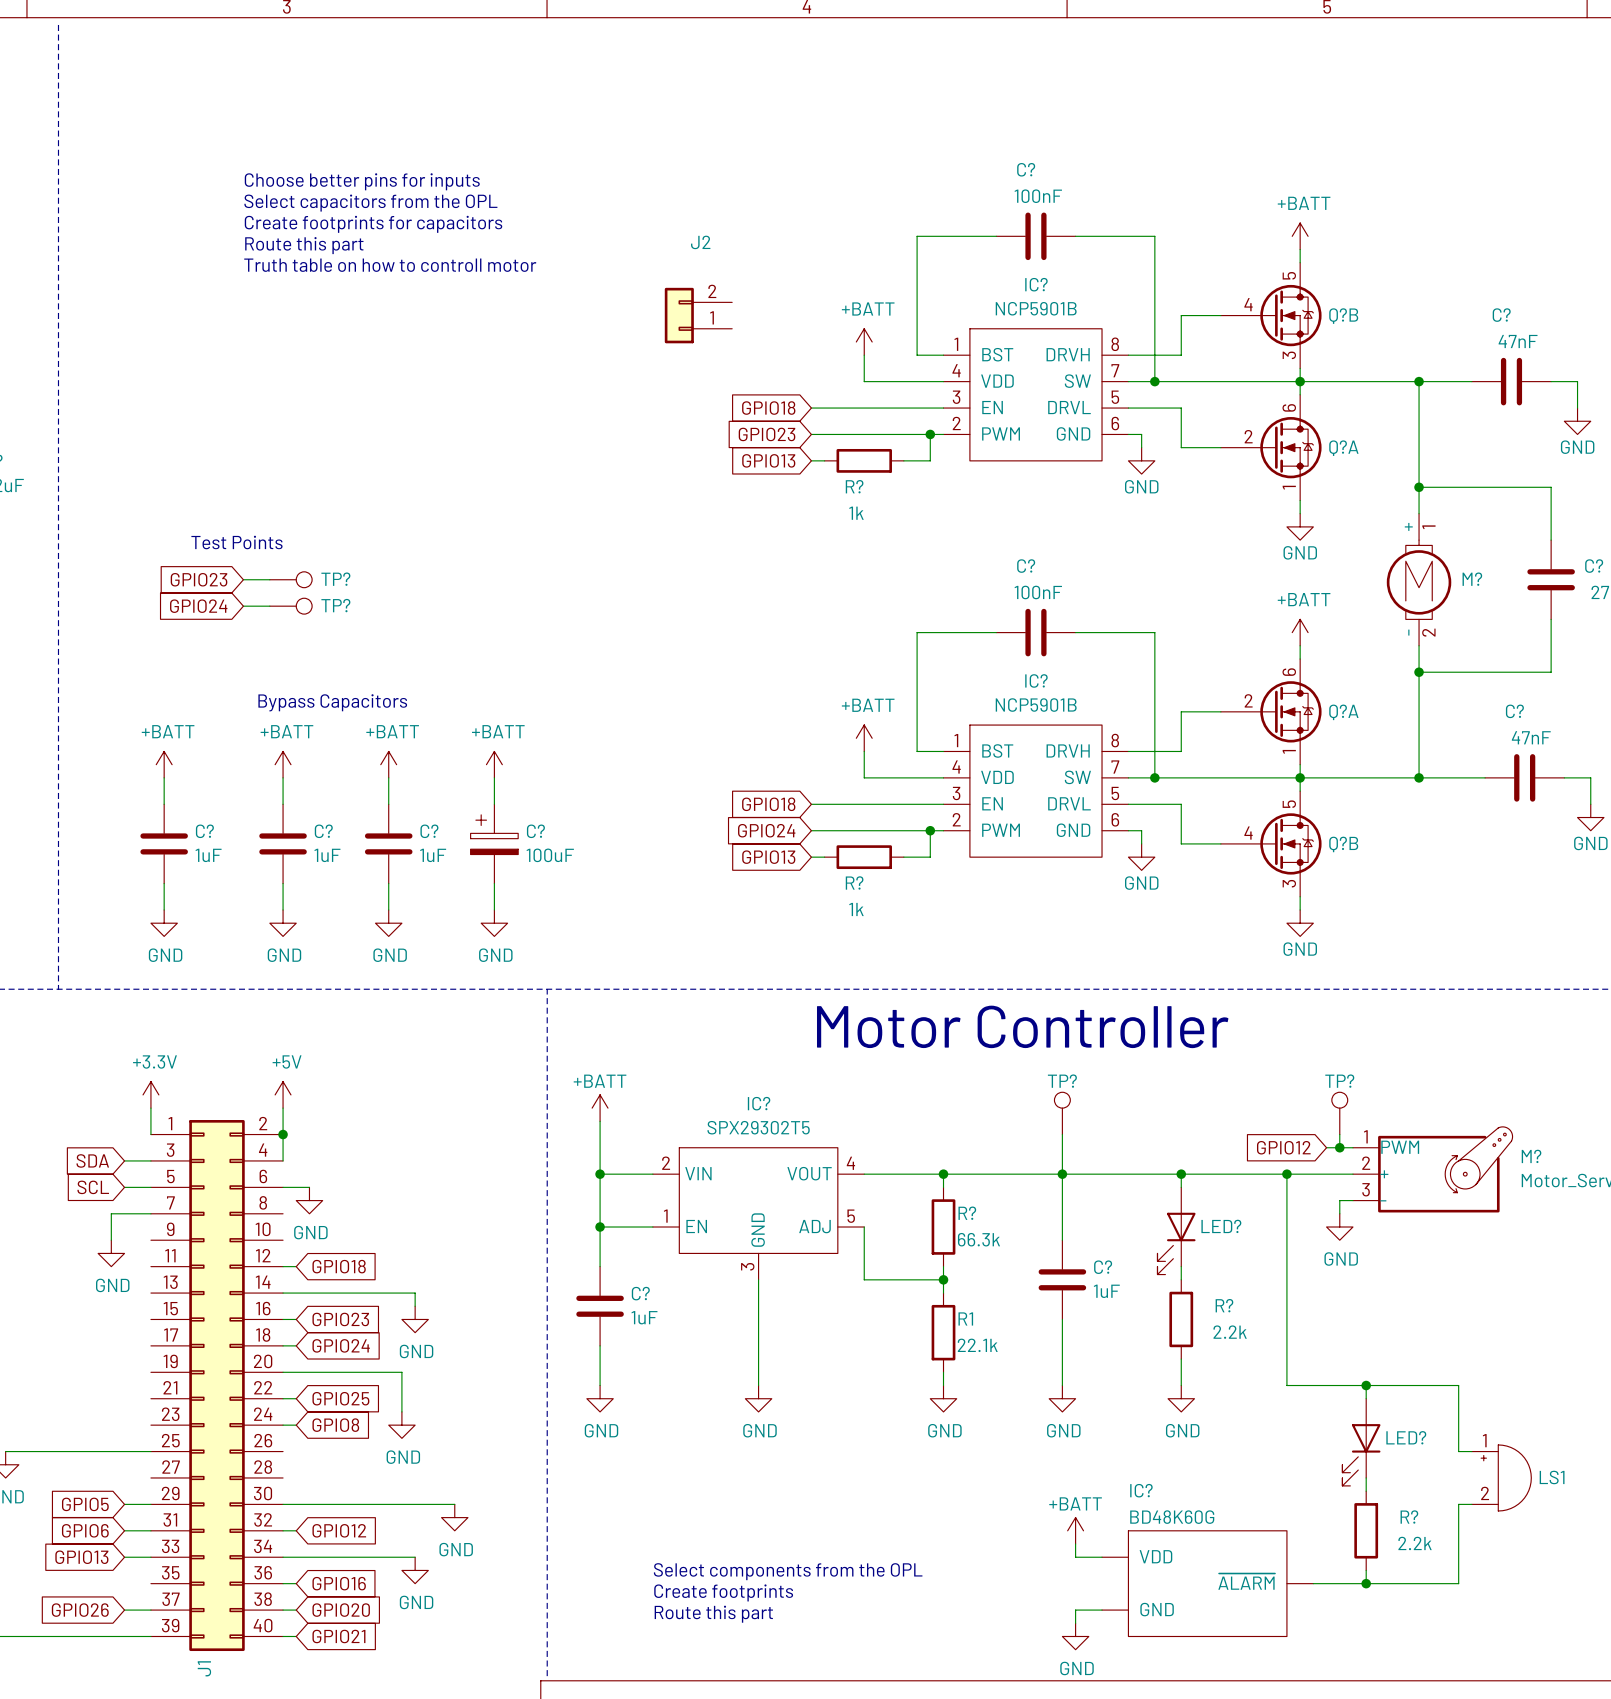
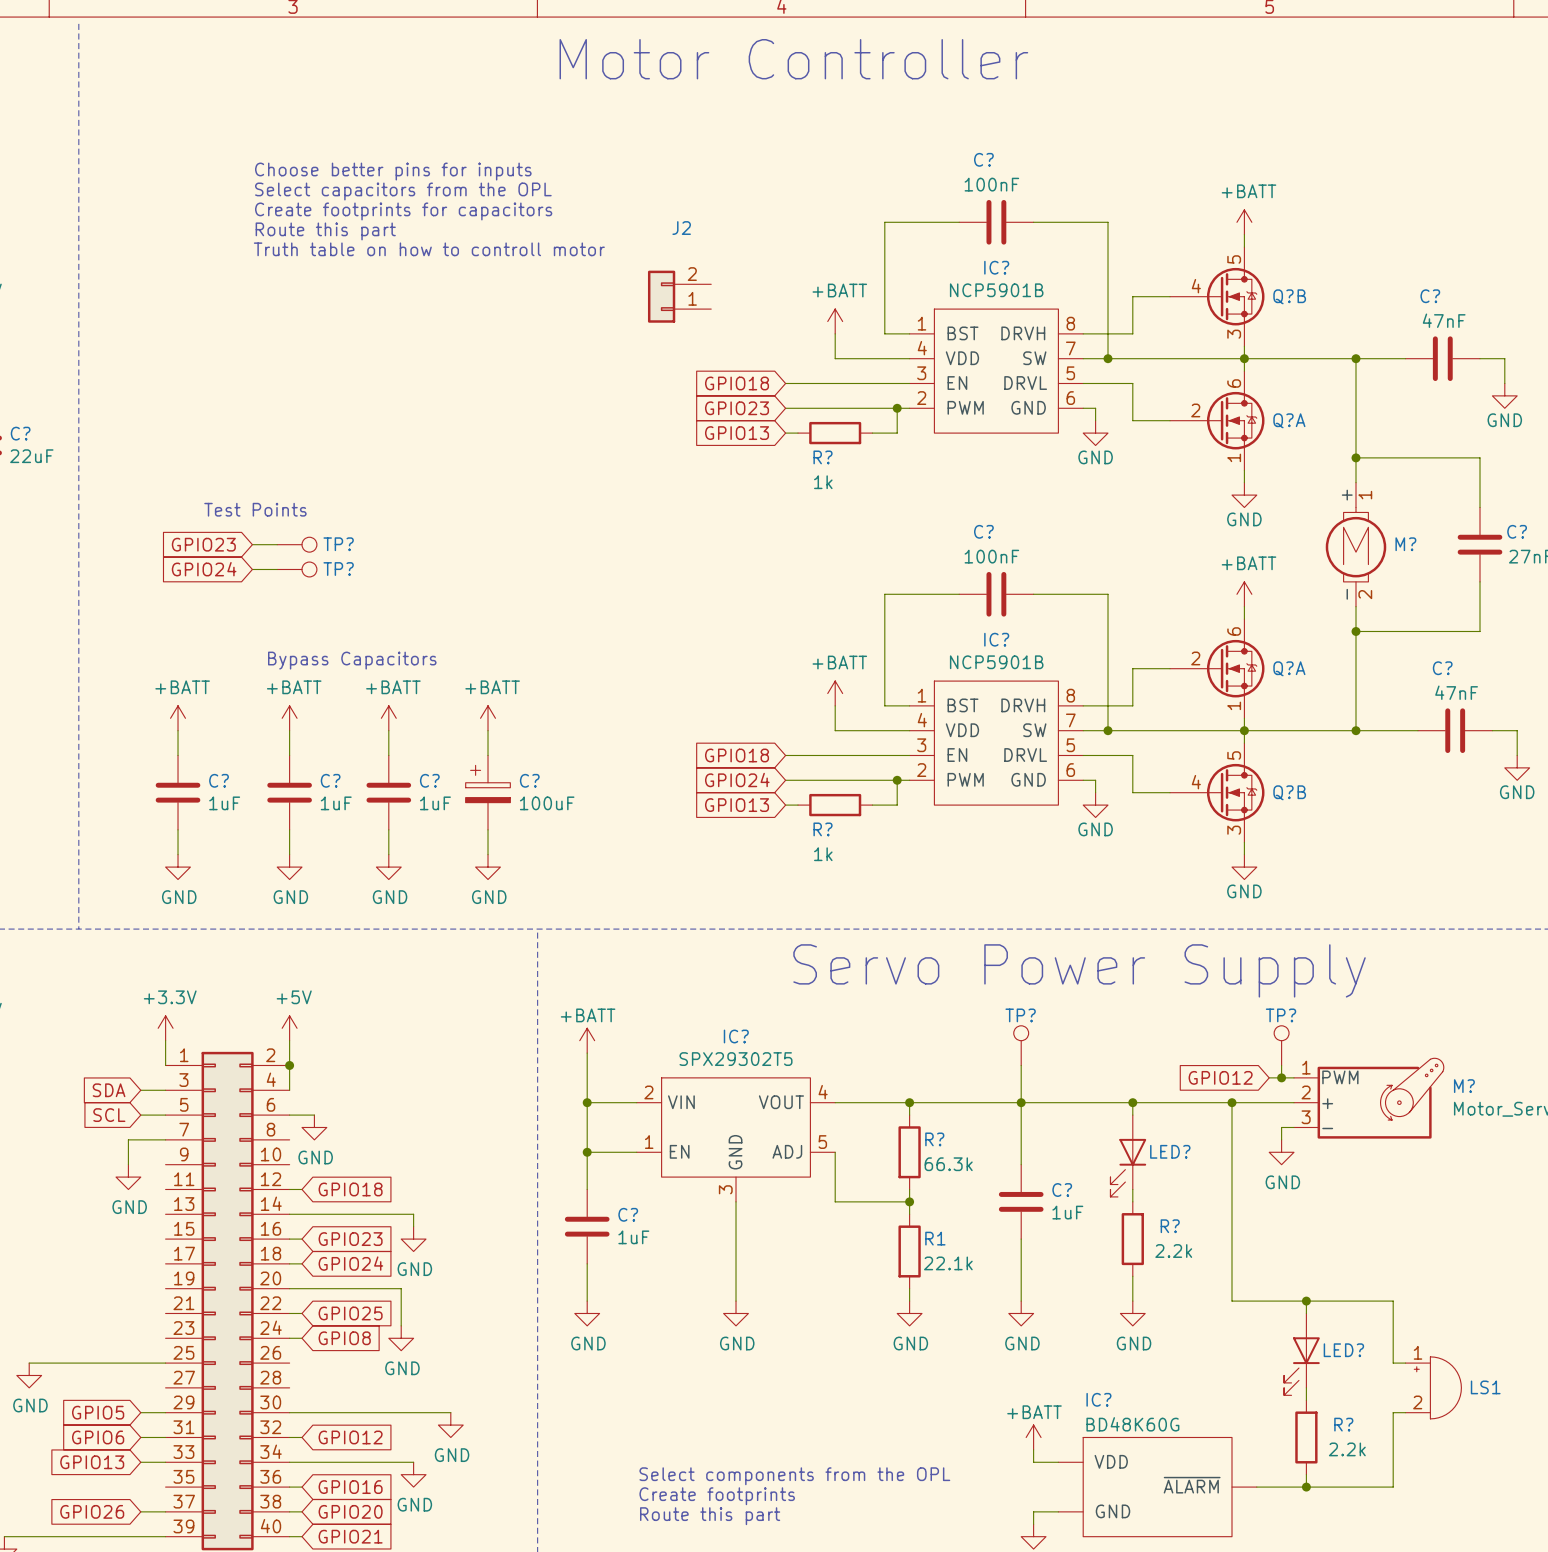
text: none -> Motor Controller (793, 59)
text: Motor Controller (1022, 1026) -> Servo Power Supply (1079, 970)

